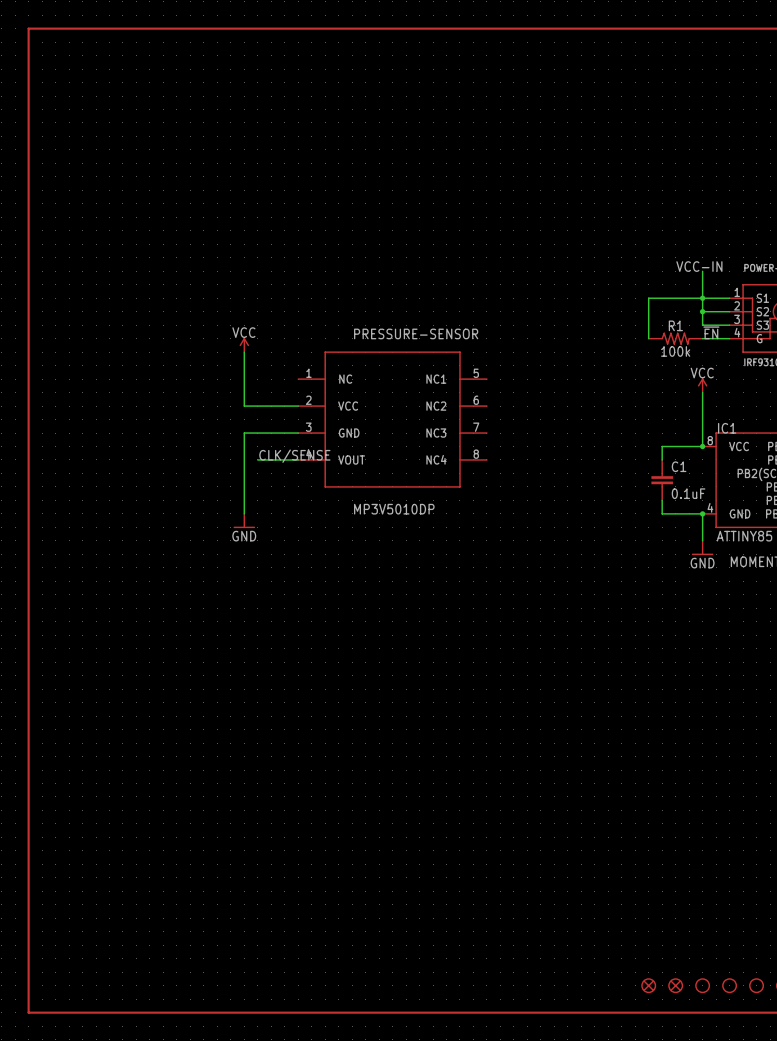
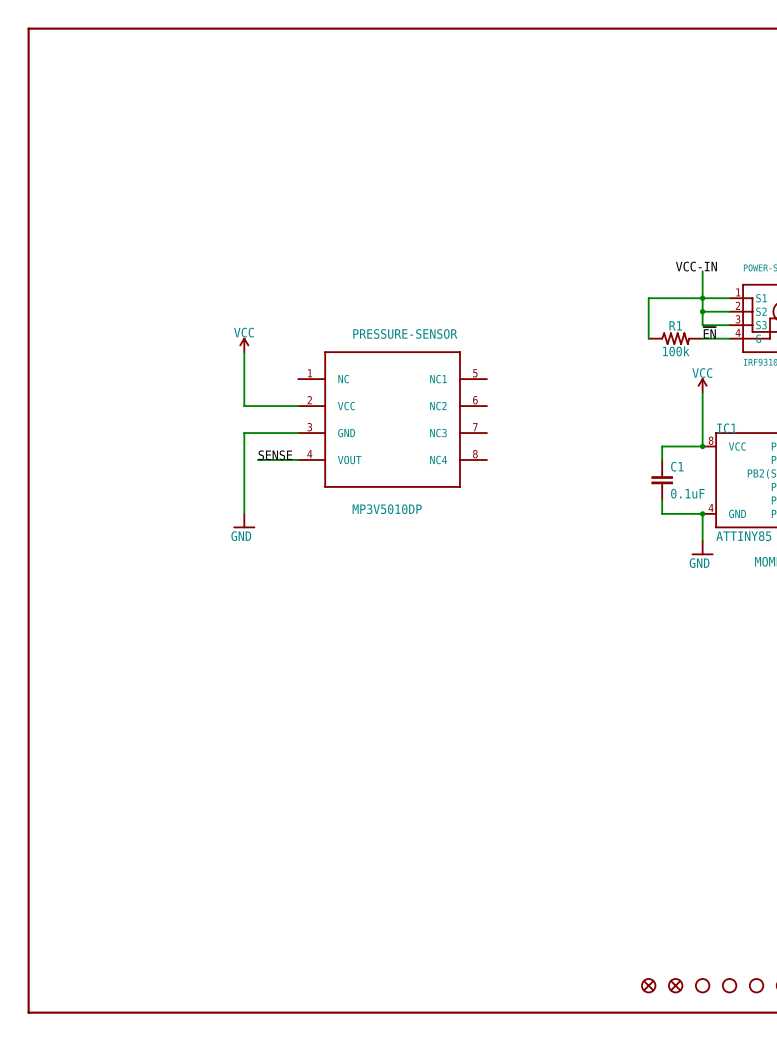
label: CLK/SENSE (294, 456) -> SENSE (275, 455)

